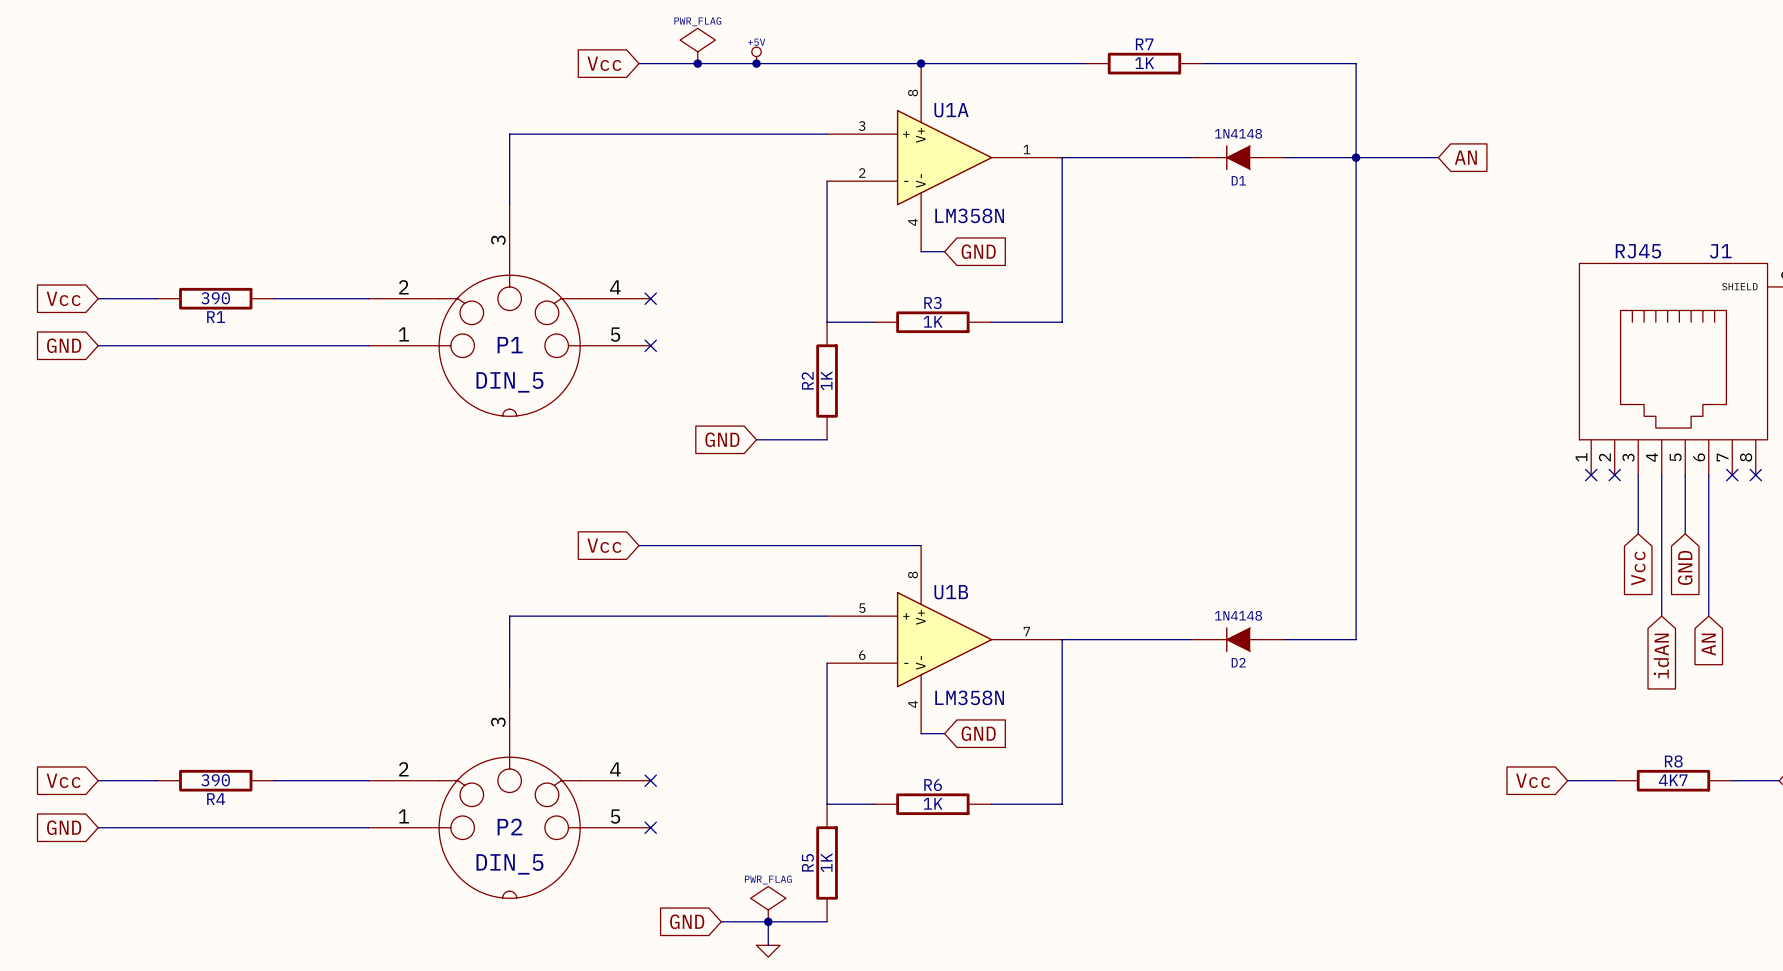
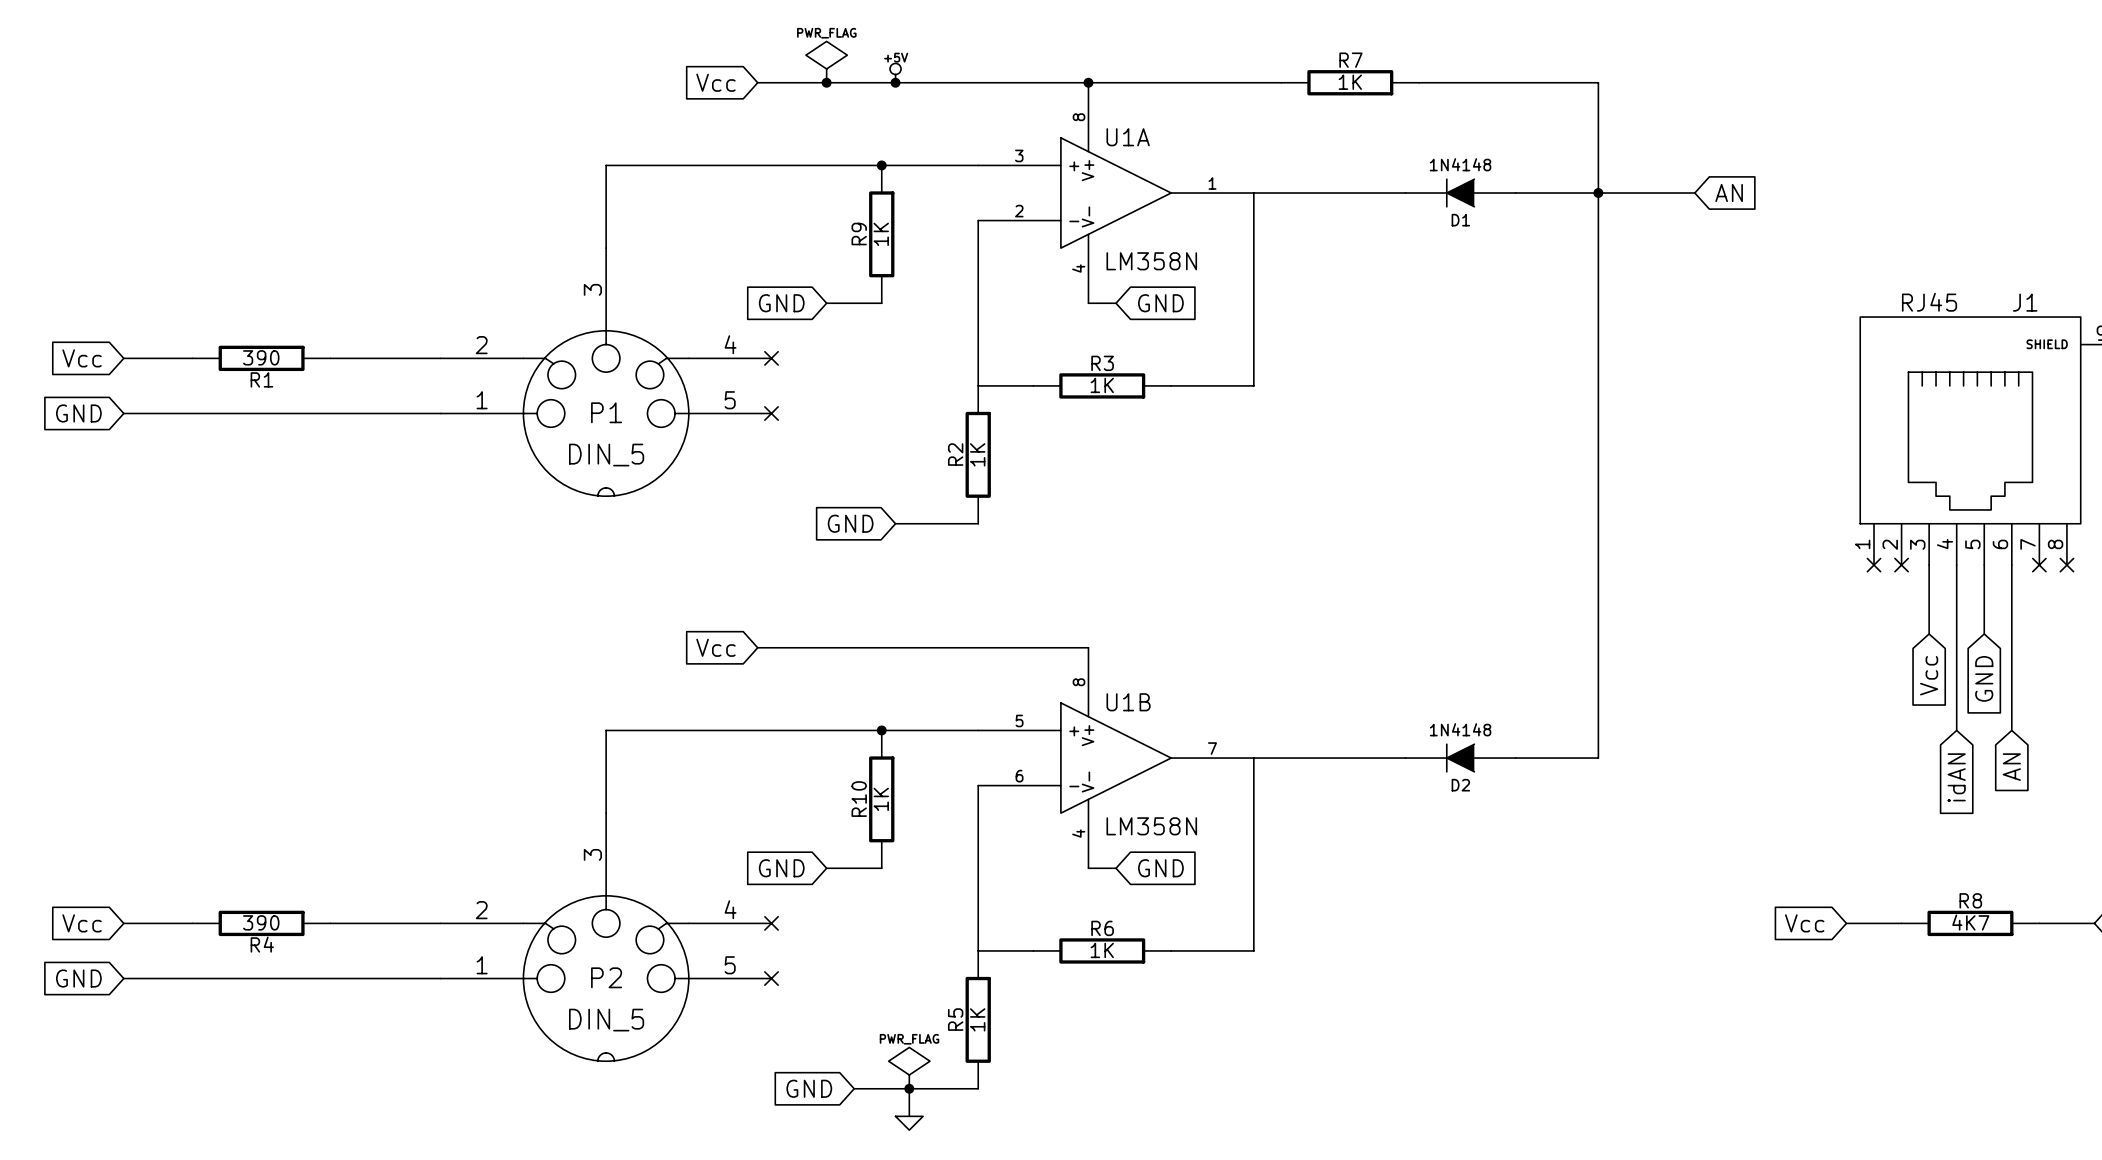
junction: none -> (881, 165)
R9: none -> 1K (881, 234)
global label: none -> GND (781, 303)
wire: none -> (826, 303) (881, 303)
junction: none -> (881, 730)
R10: none -> 1K (881, 799)
global label: none -> GND (781, 868)
wire: none -> (826, 868) (881, 868)

